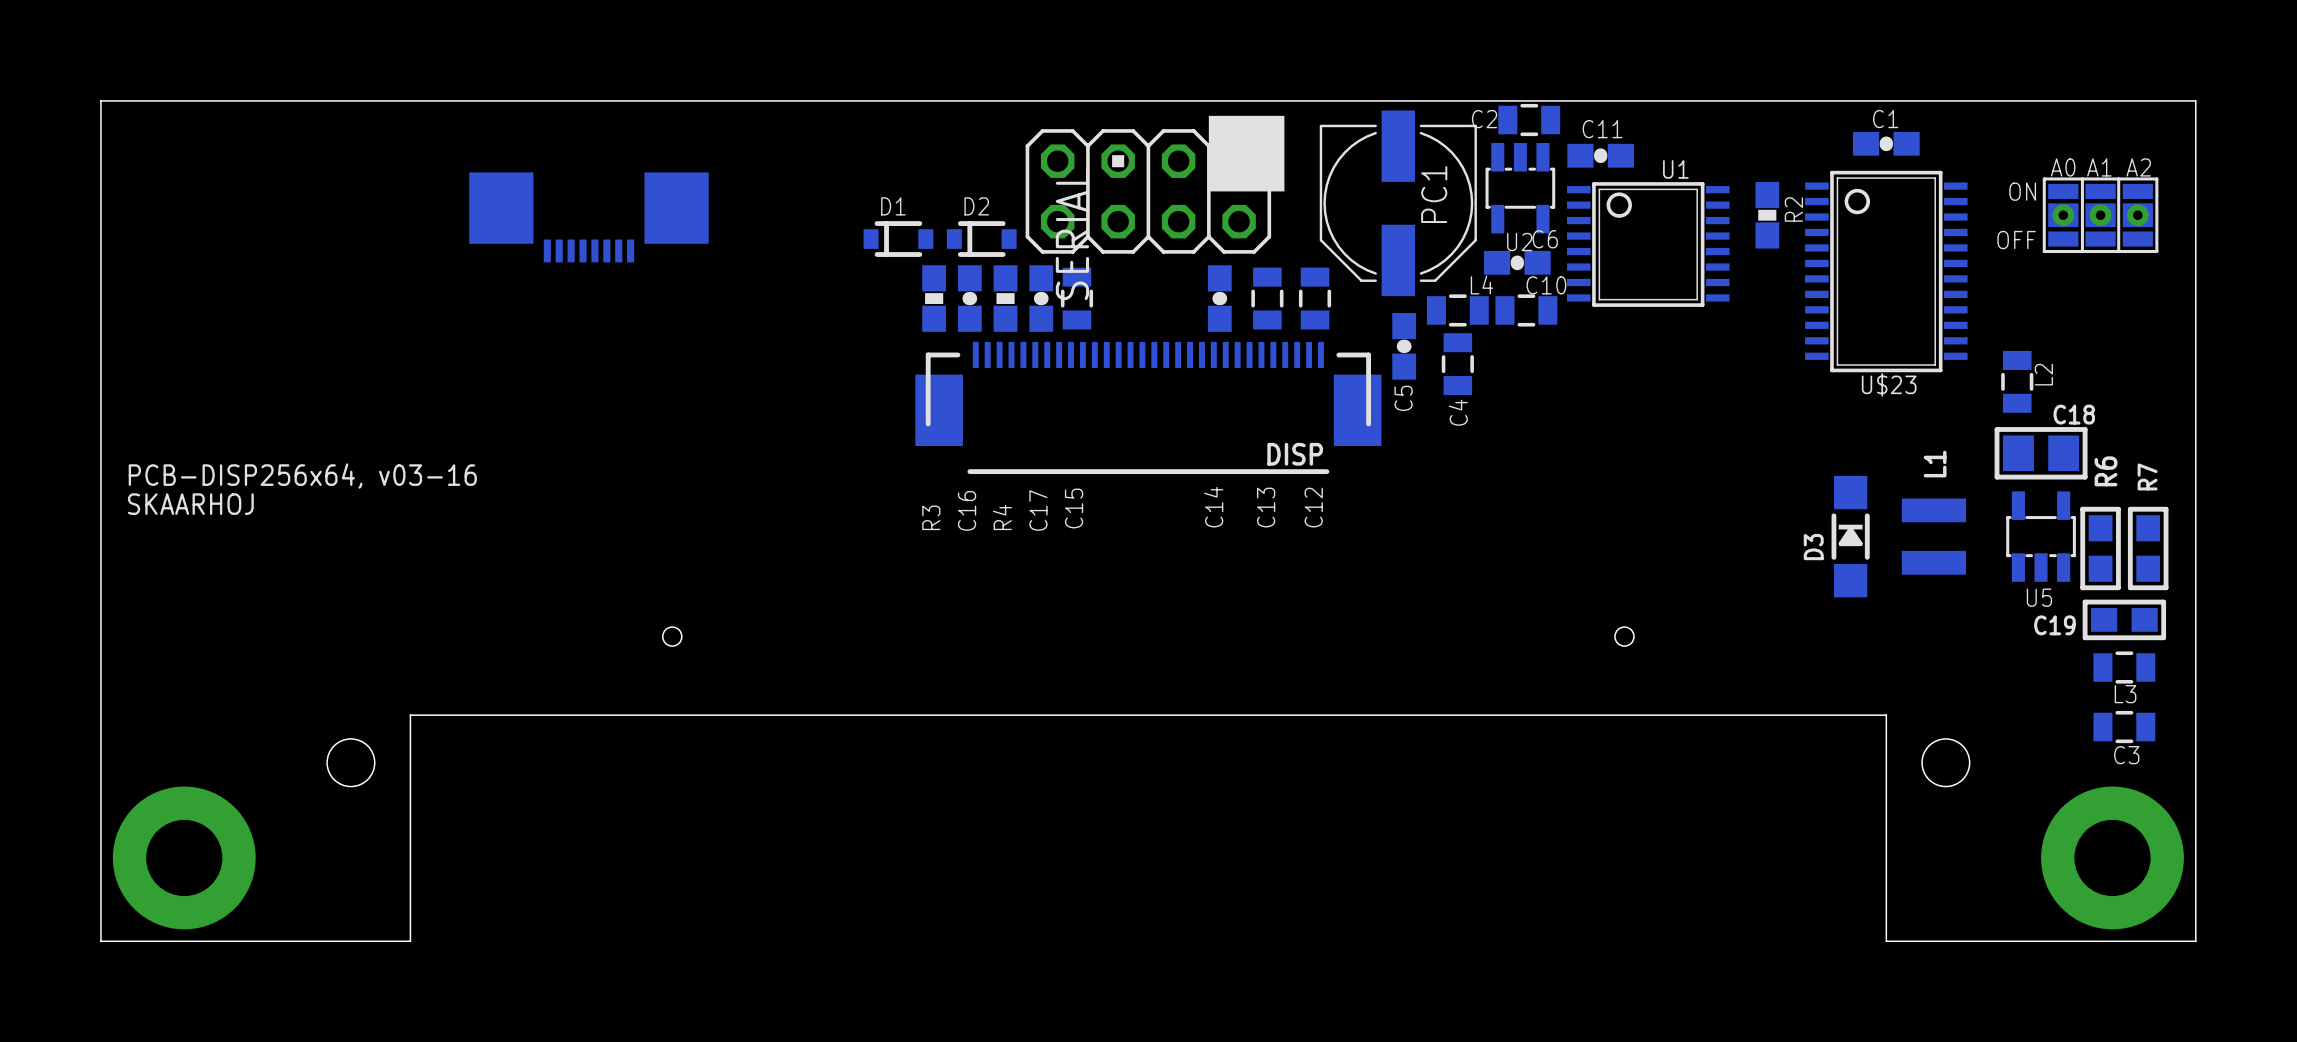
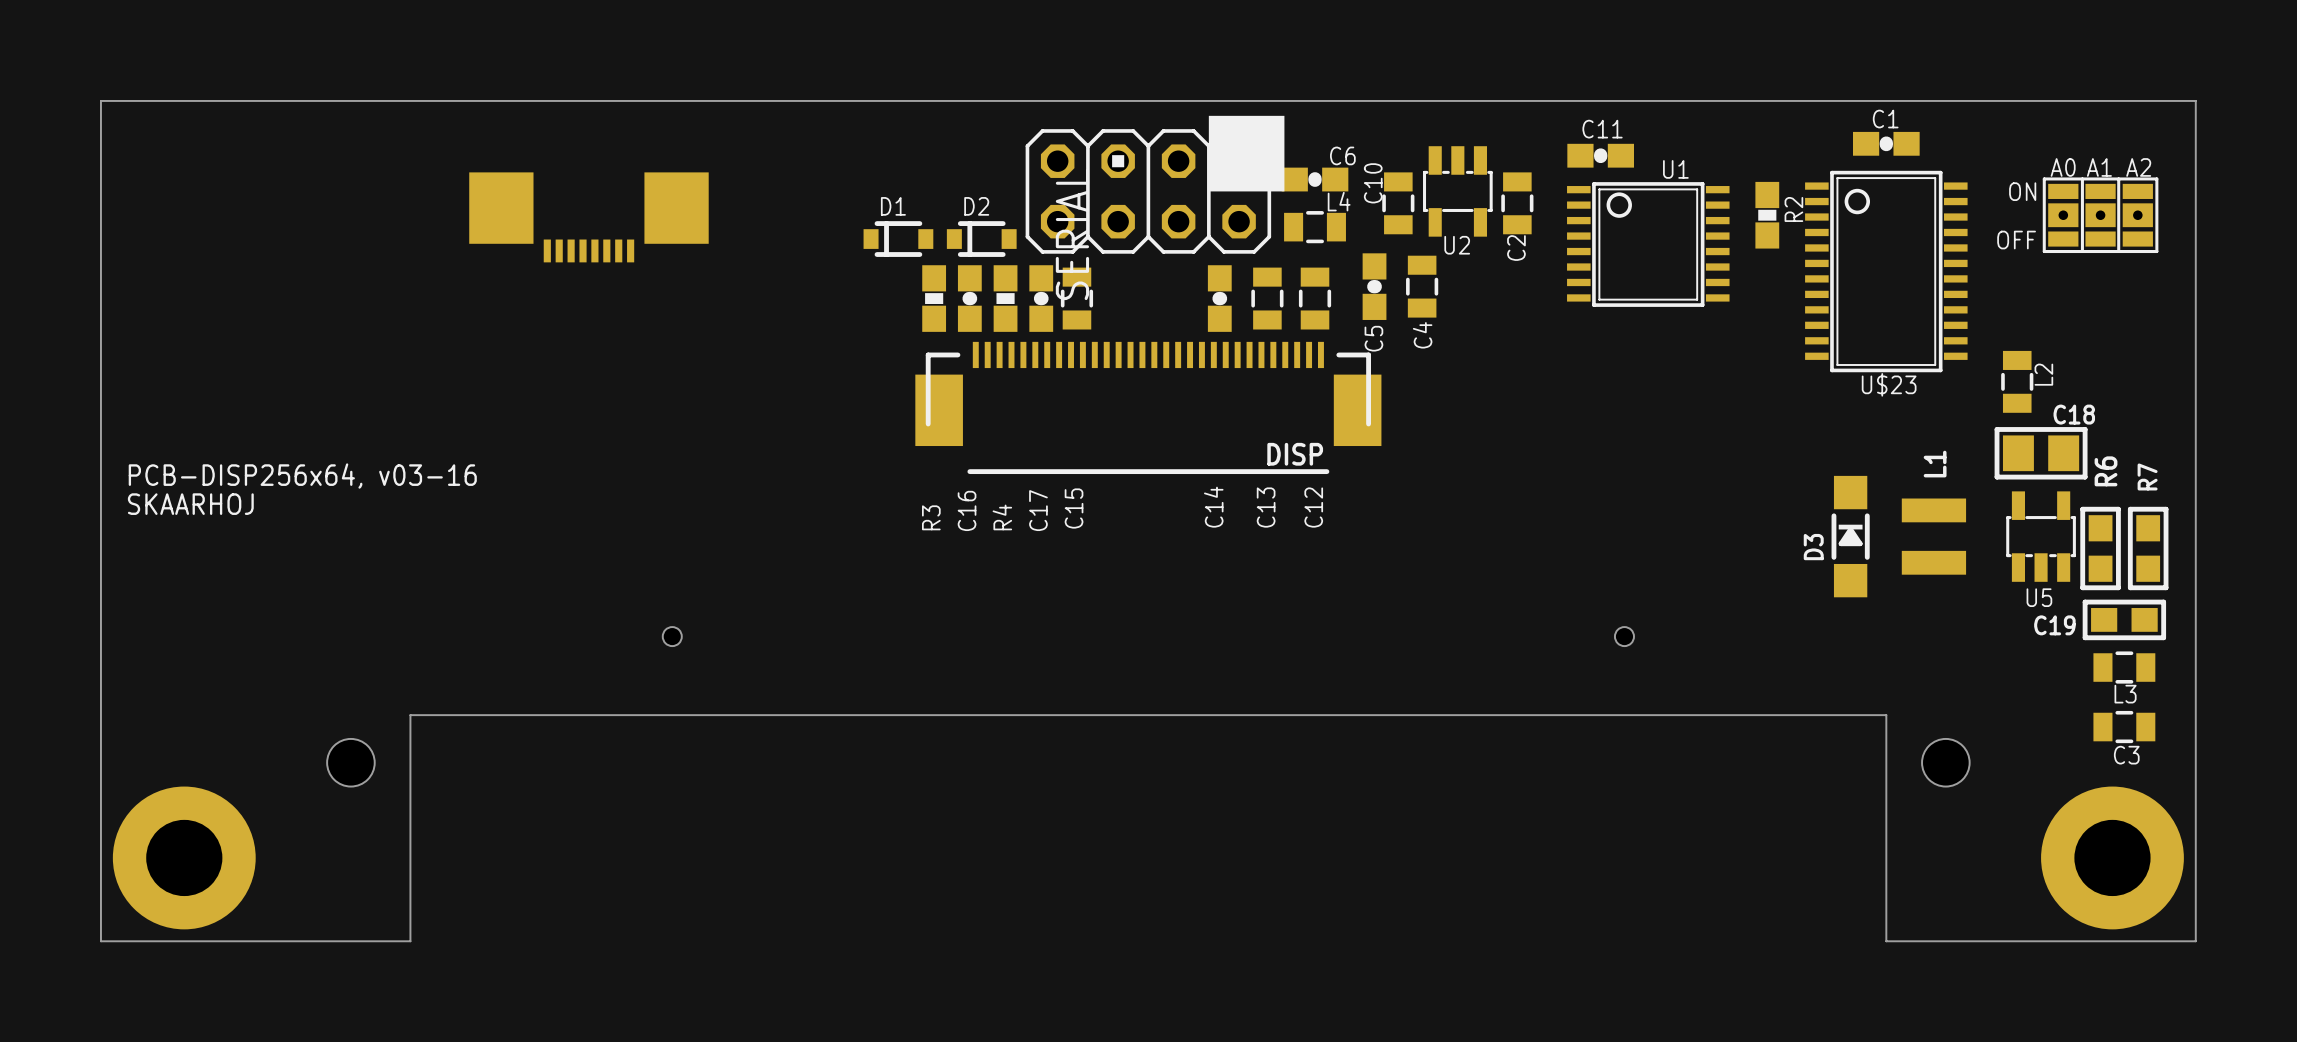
C2 name position: C2 (1484, 119) -> C2 (1516, 248)
C2 rotation: 0° (1529, 120) -> 90° clockwise (1517, 203)
C2 position: (1529, 120) -> (1517, 203)
U2 position: (1520, 188) -> (1457, 191)
PC1: (1398, 203) -> none
C6 position: (1517, 262) -> (1315, 179)
C10 name position: C10 (1546, 285) -> C10 (1373, 183)
L4 position: (1457, 310) -> (1315, 227)
C10 rotation: 0° (1526, 310) -> 90° clockwise (1398, 203)
C10 position: (1526, 310) -> (1398, 203)
C5 position: (1404, 346) -> (1374, 286)
C4 position: (1457, 364) -> (1422, 286)

